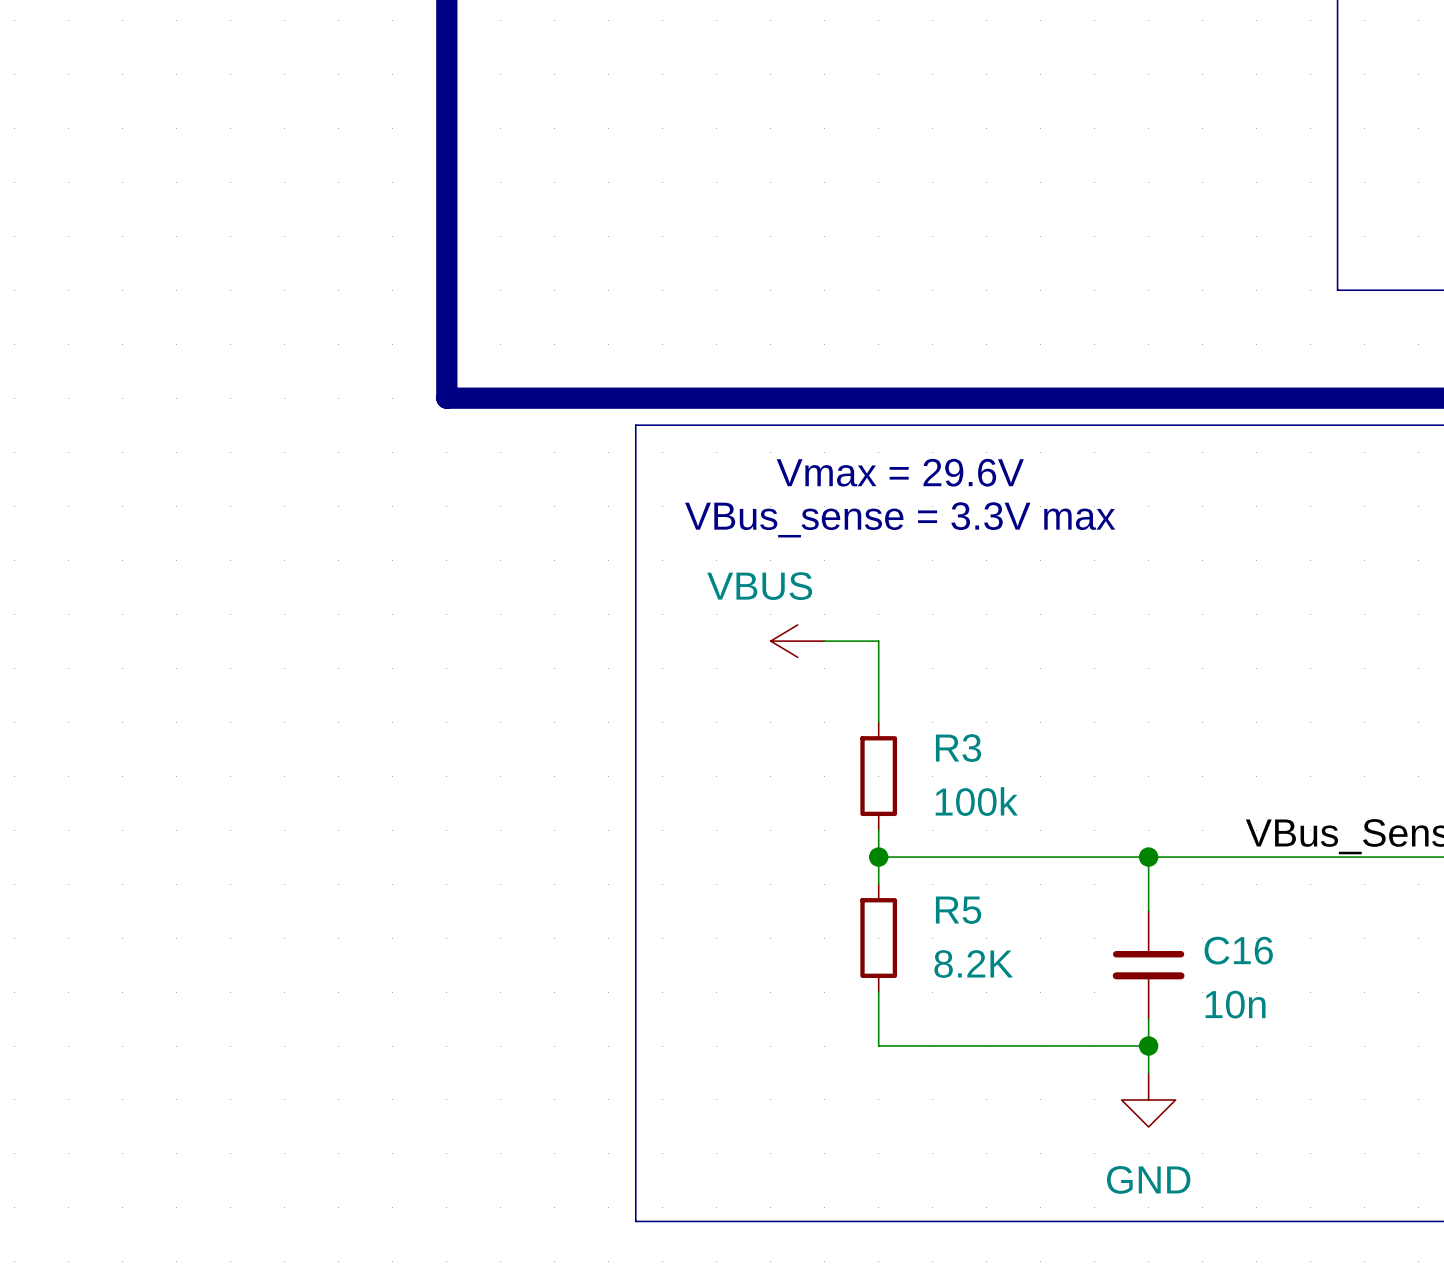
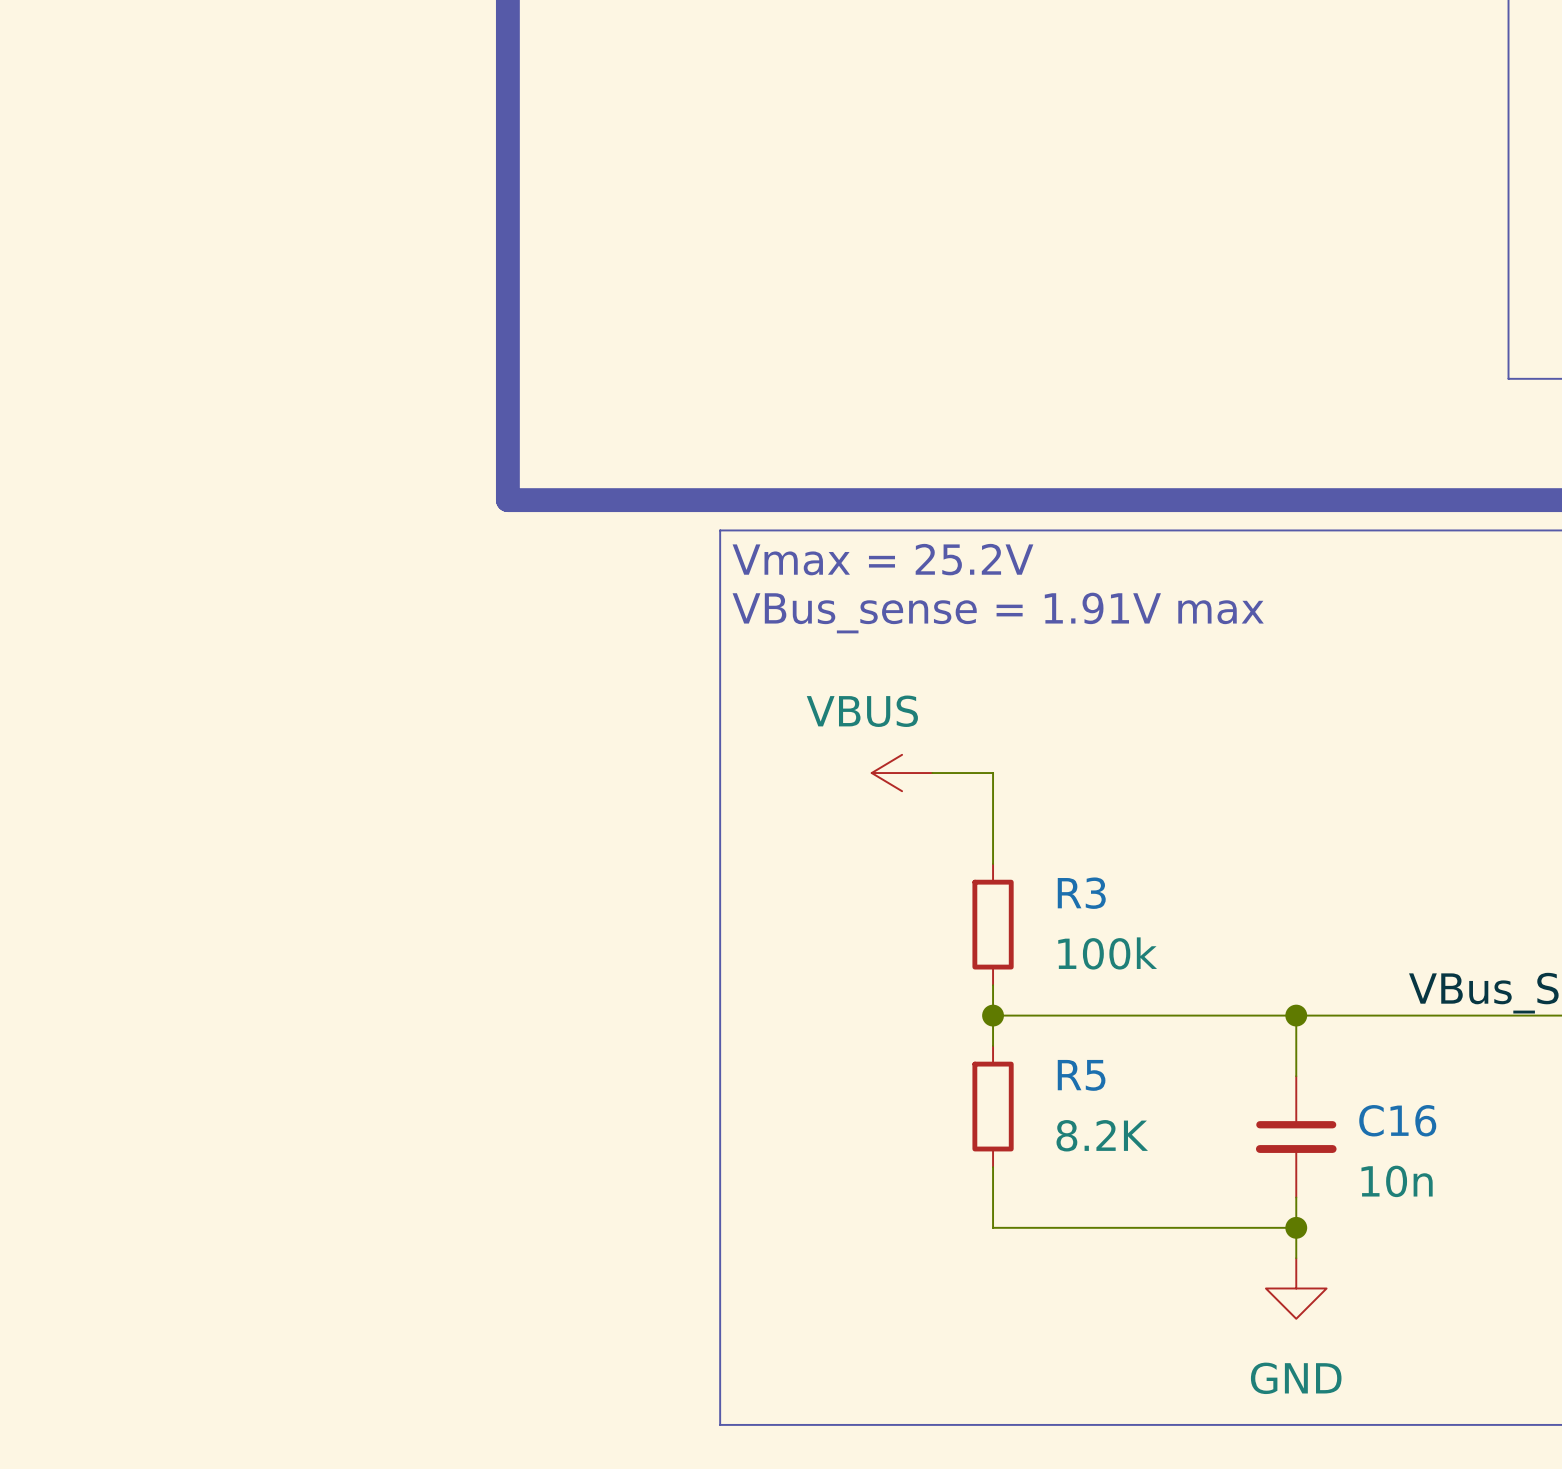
text: Vmax = 29.6V (900, 472) -> Vmax = 25.2V (882, 559)
text: VBus_sense = 3.3V max (900, 519) -> VBus_sense = 1.91V max (998, 613)

